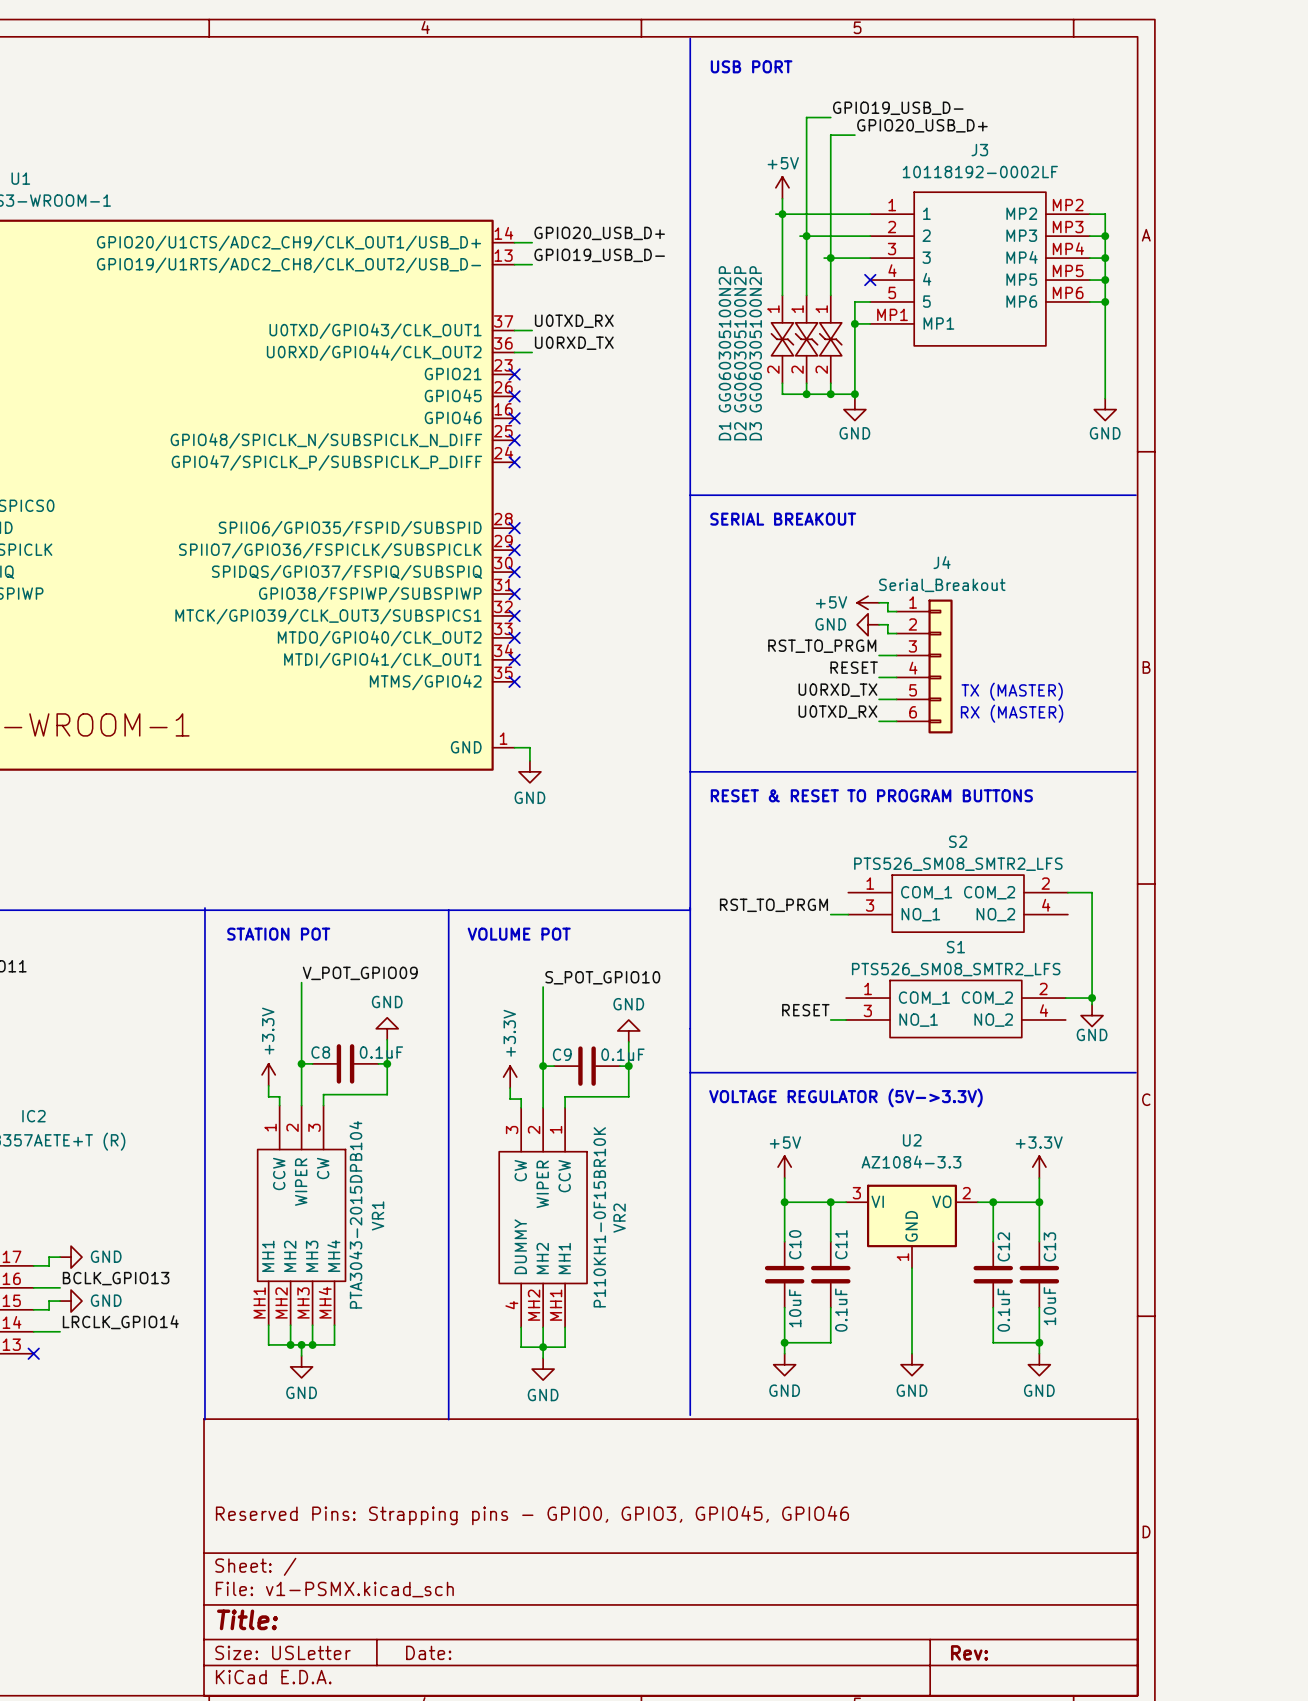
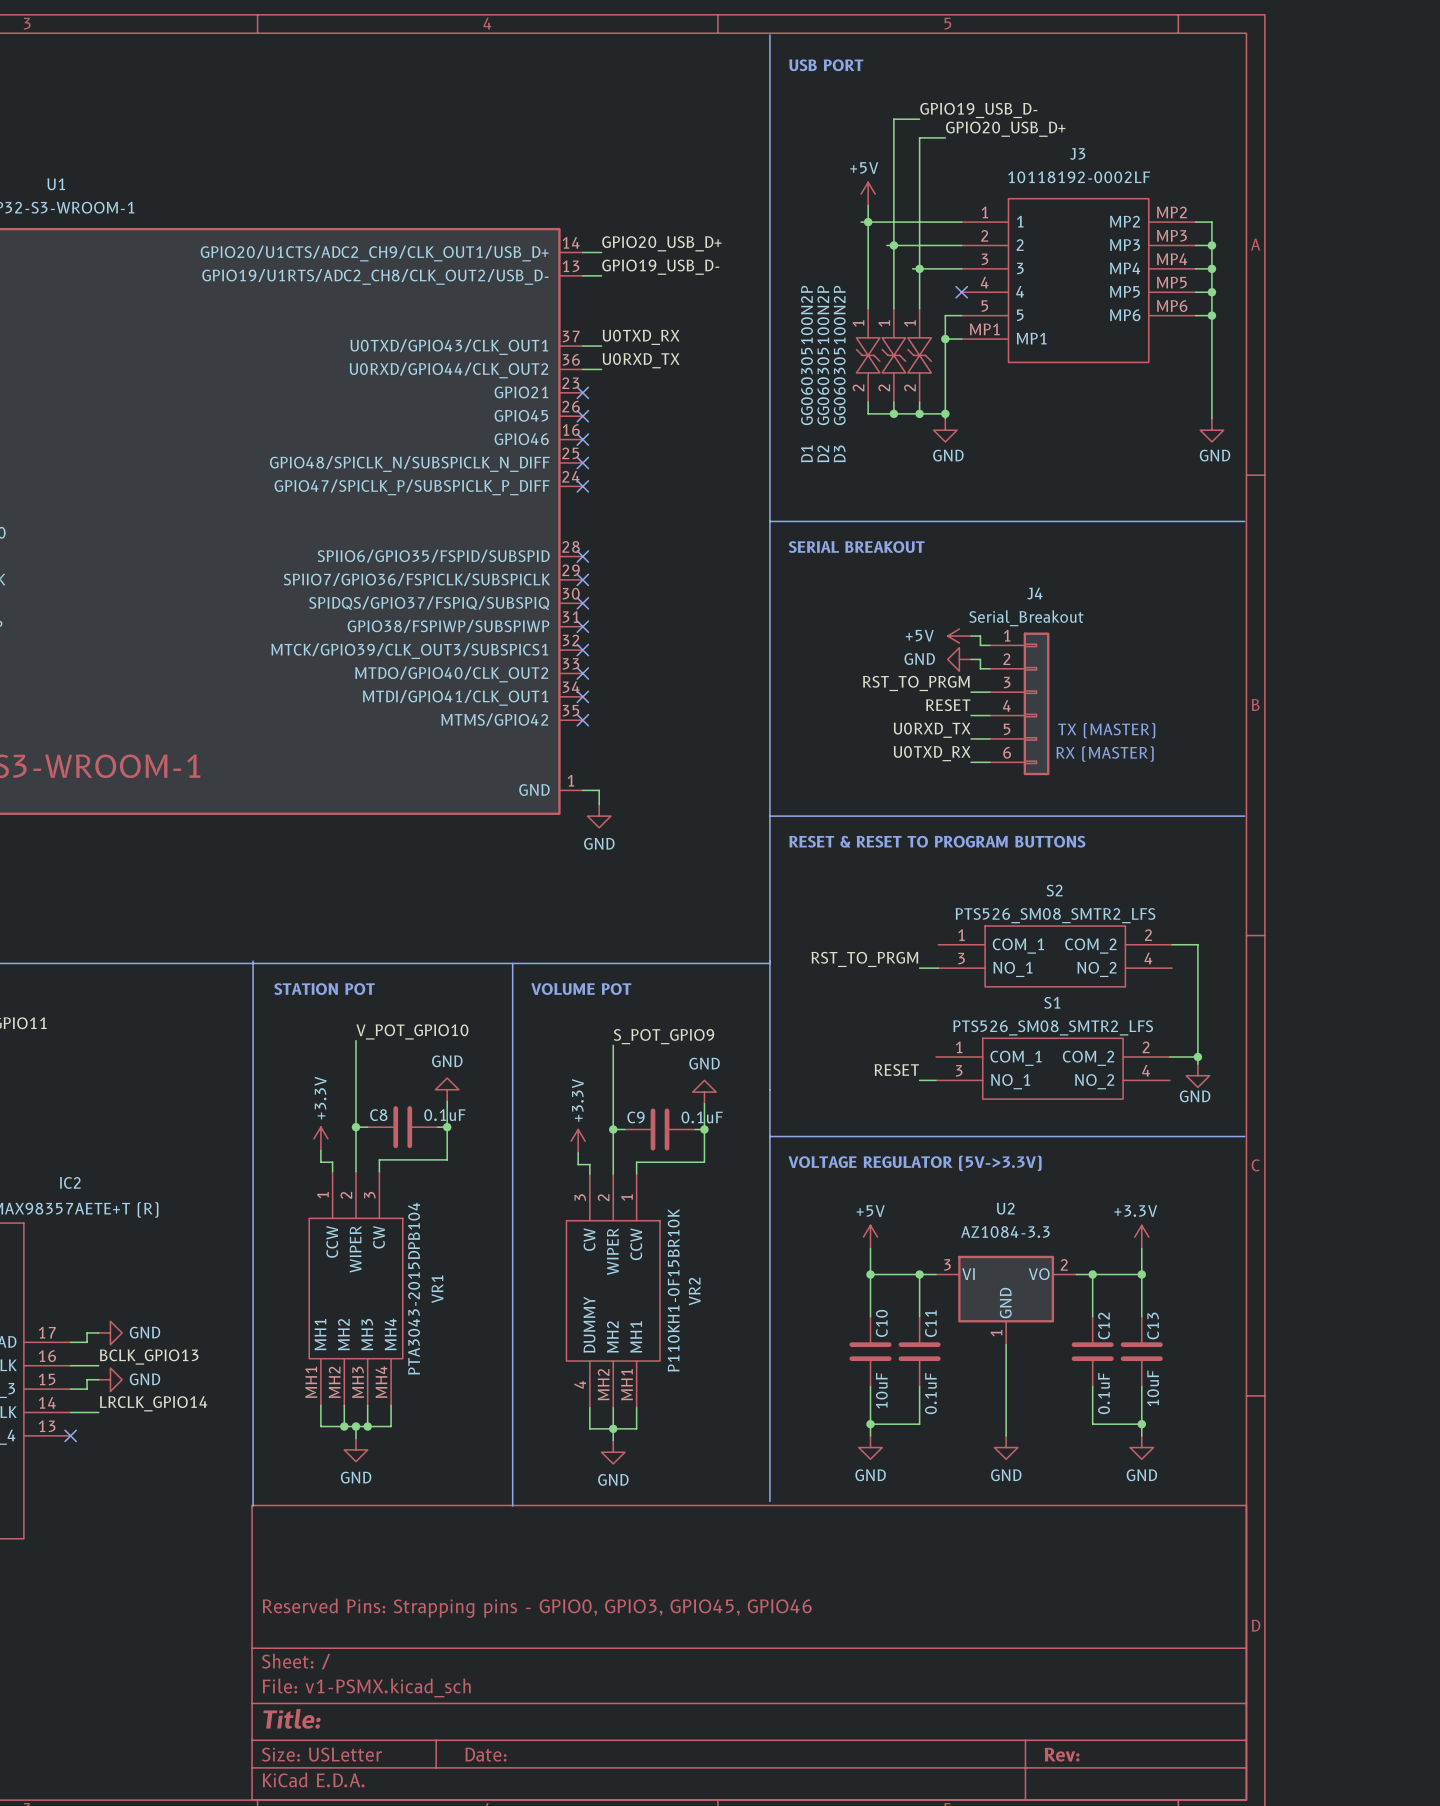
label: V_POT_GPIO09 (360, 973) -> V_POT_GPIO10 (412, 1031)
label: S_POT_GPIO10 (602, 977) -> S_POT_GPIO9 (664, 1036)

